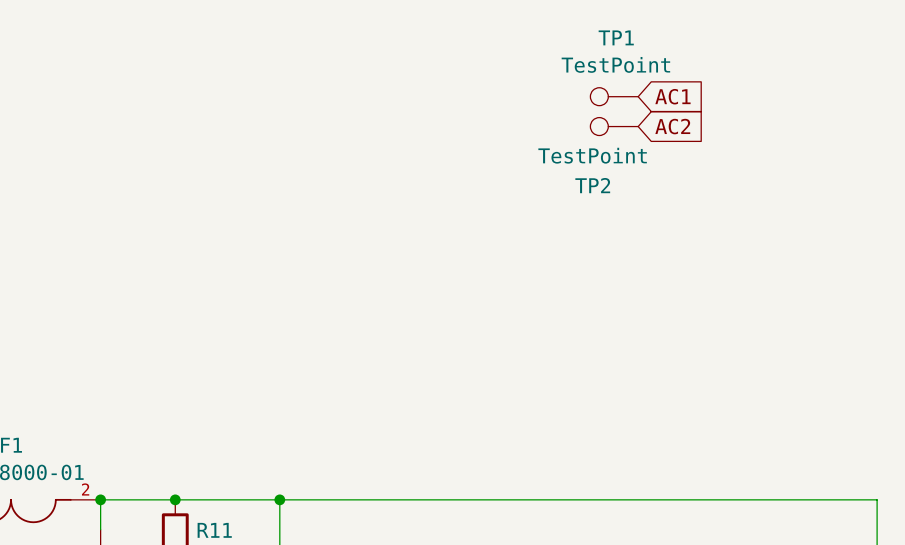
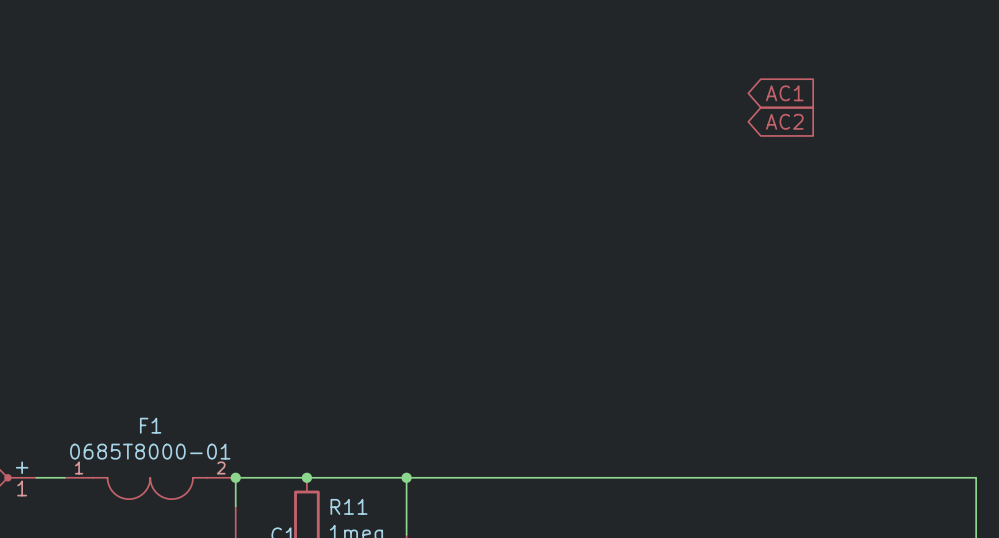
TP1: TestPoint (614, 96) -> none
TP2: TestPoint (614, 126) -> none

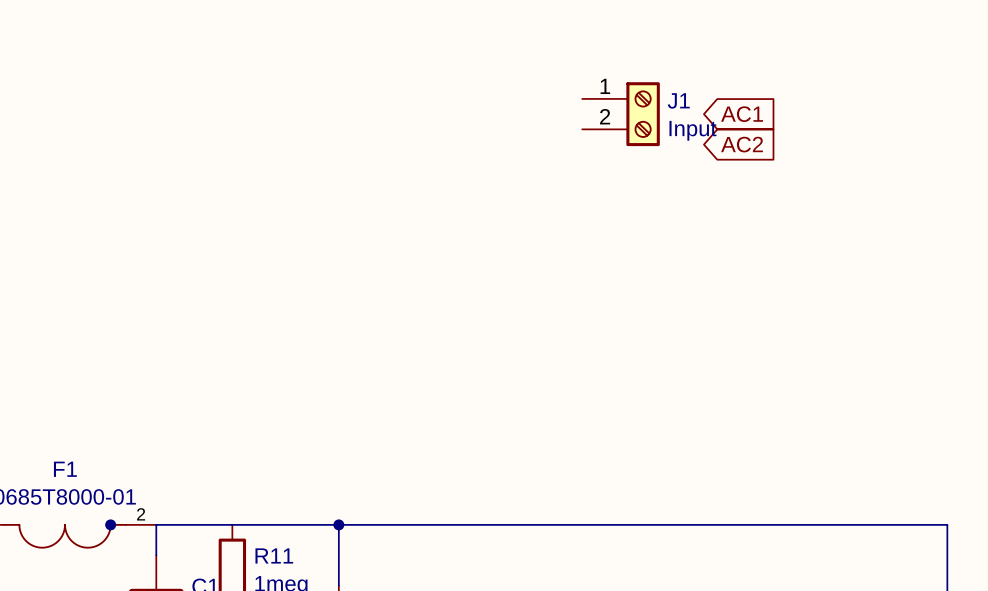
J1: none -> Input (621, 114)
junction position: (235, 477) -> (110, 524)
junction: (306, 477) -> none

